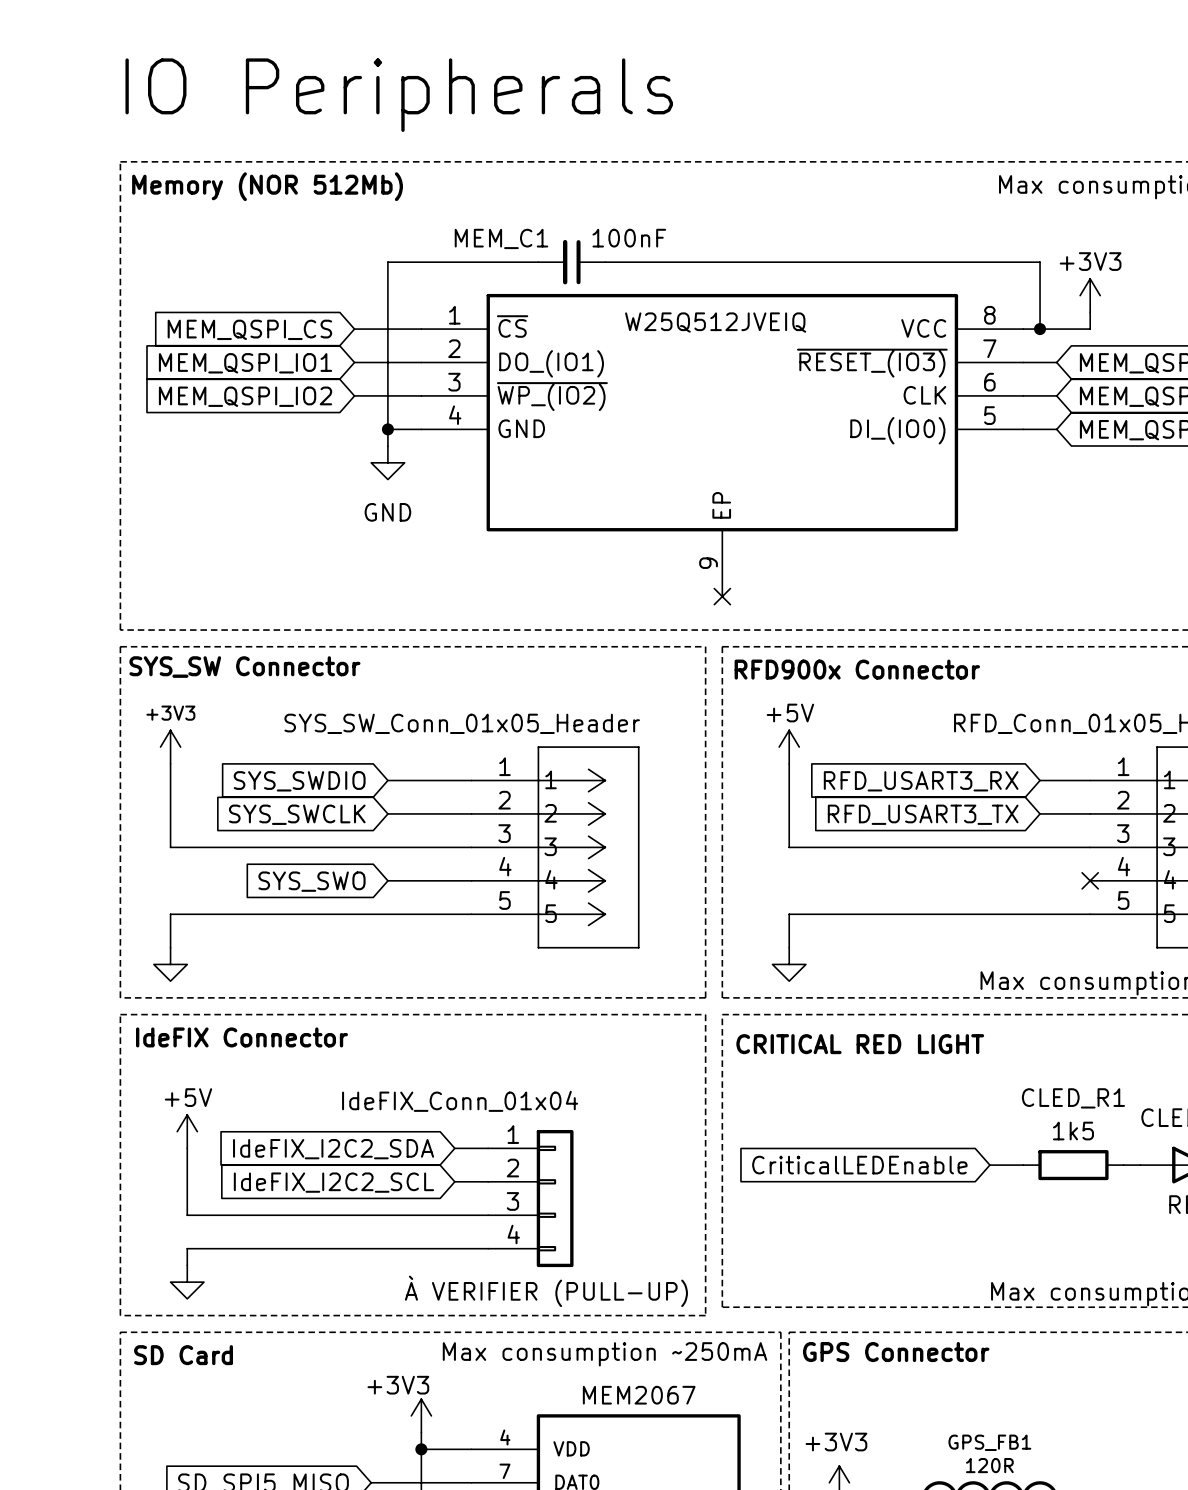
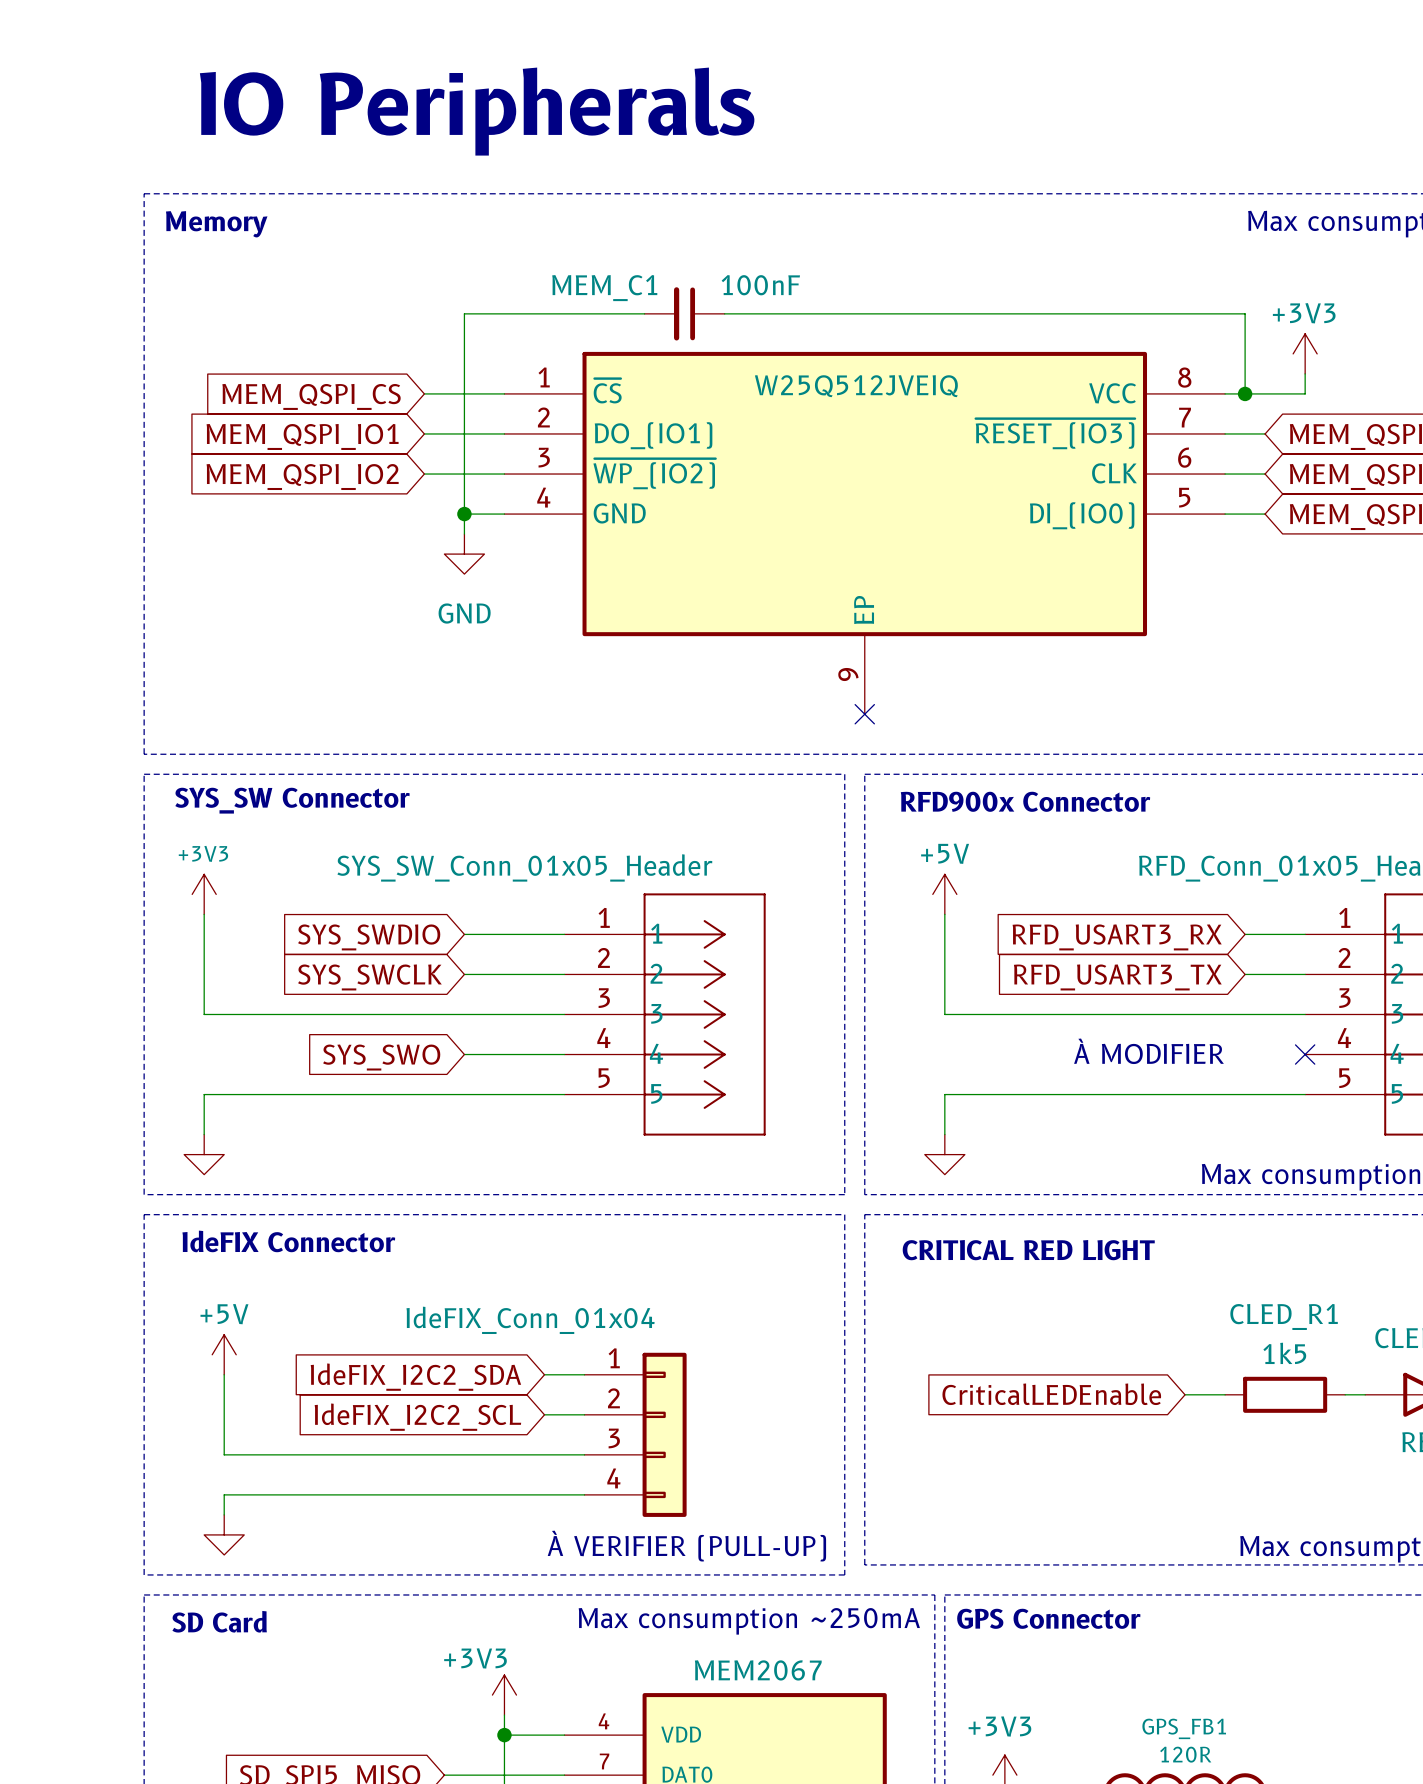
text: Memory (NOR 512Mb) (267, 186) -> none
text: none -> Memory (216, 224)
text: none -> À MODIFIER (1148, 1051)

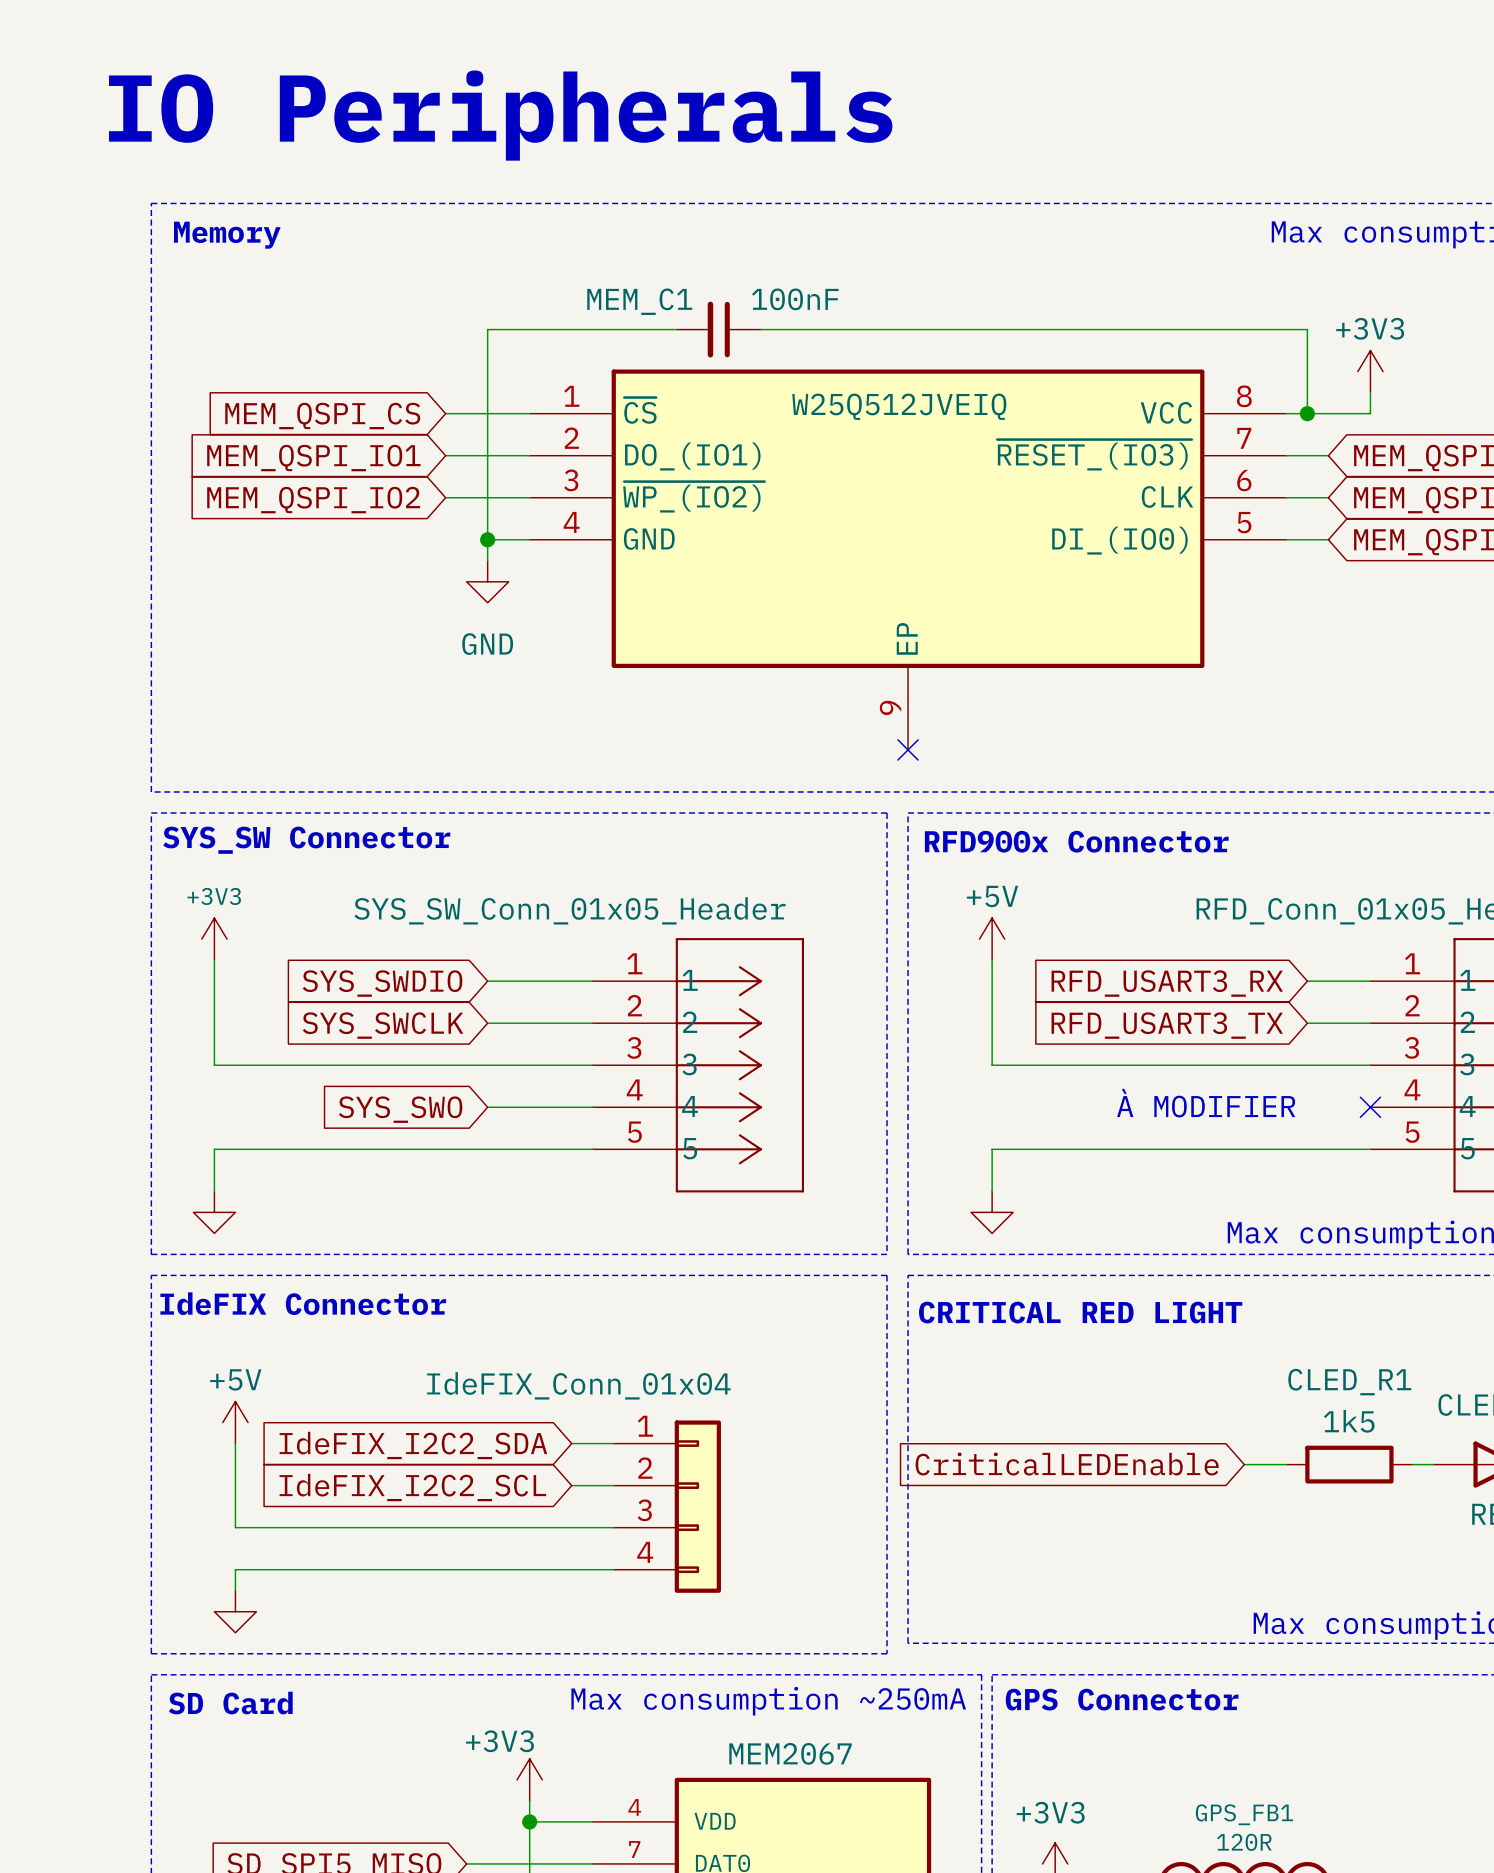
text: À VERIFIER (PULL-UP) (686, 1546) -> none

